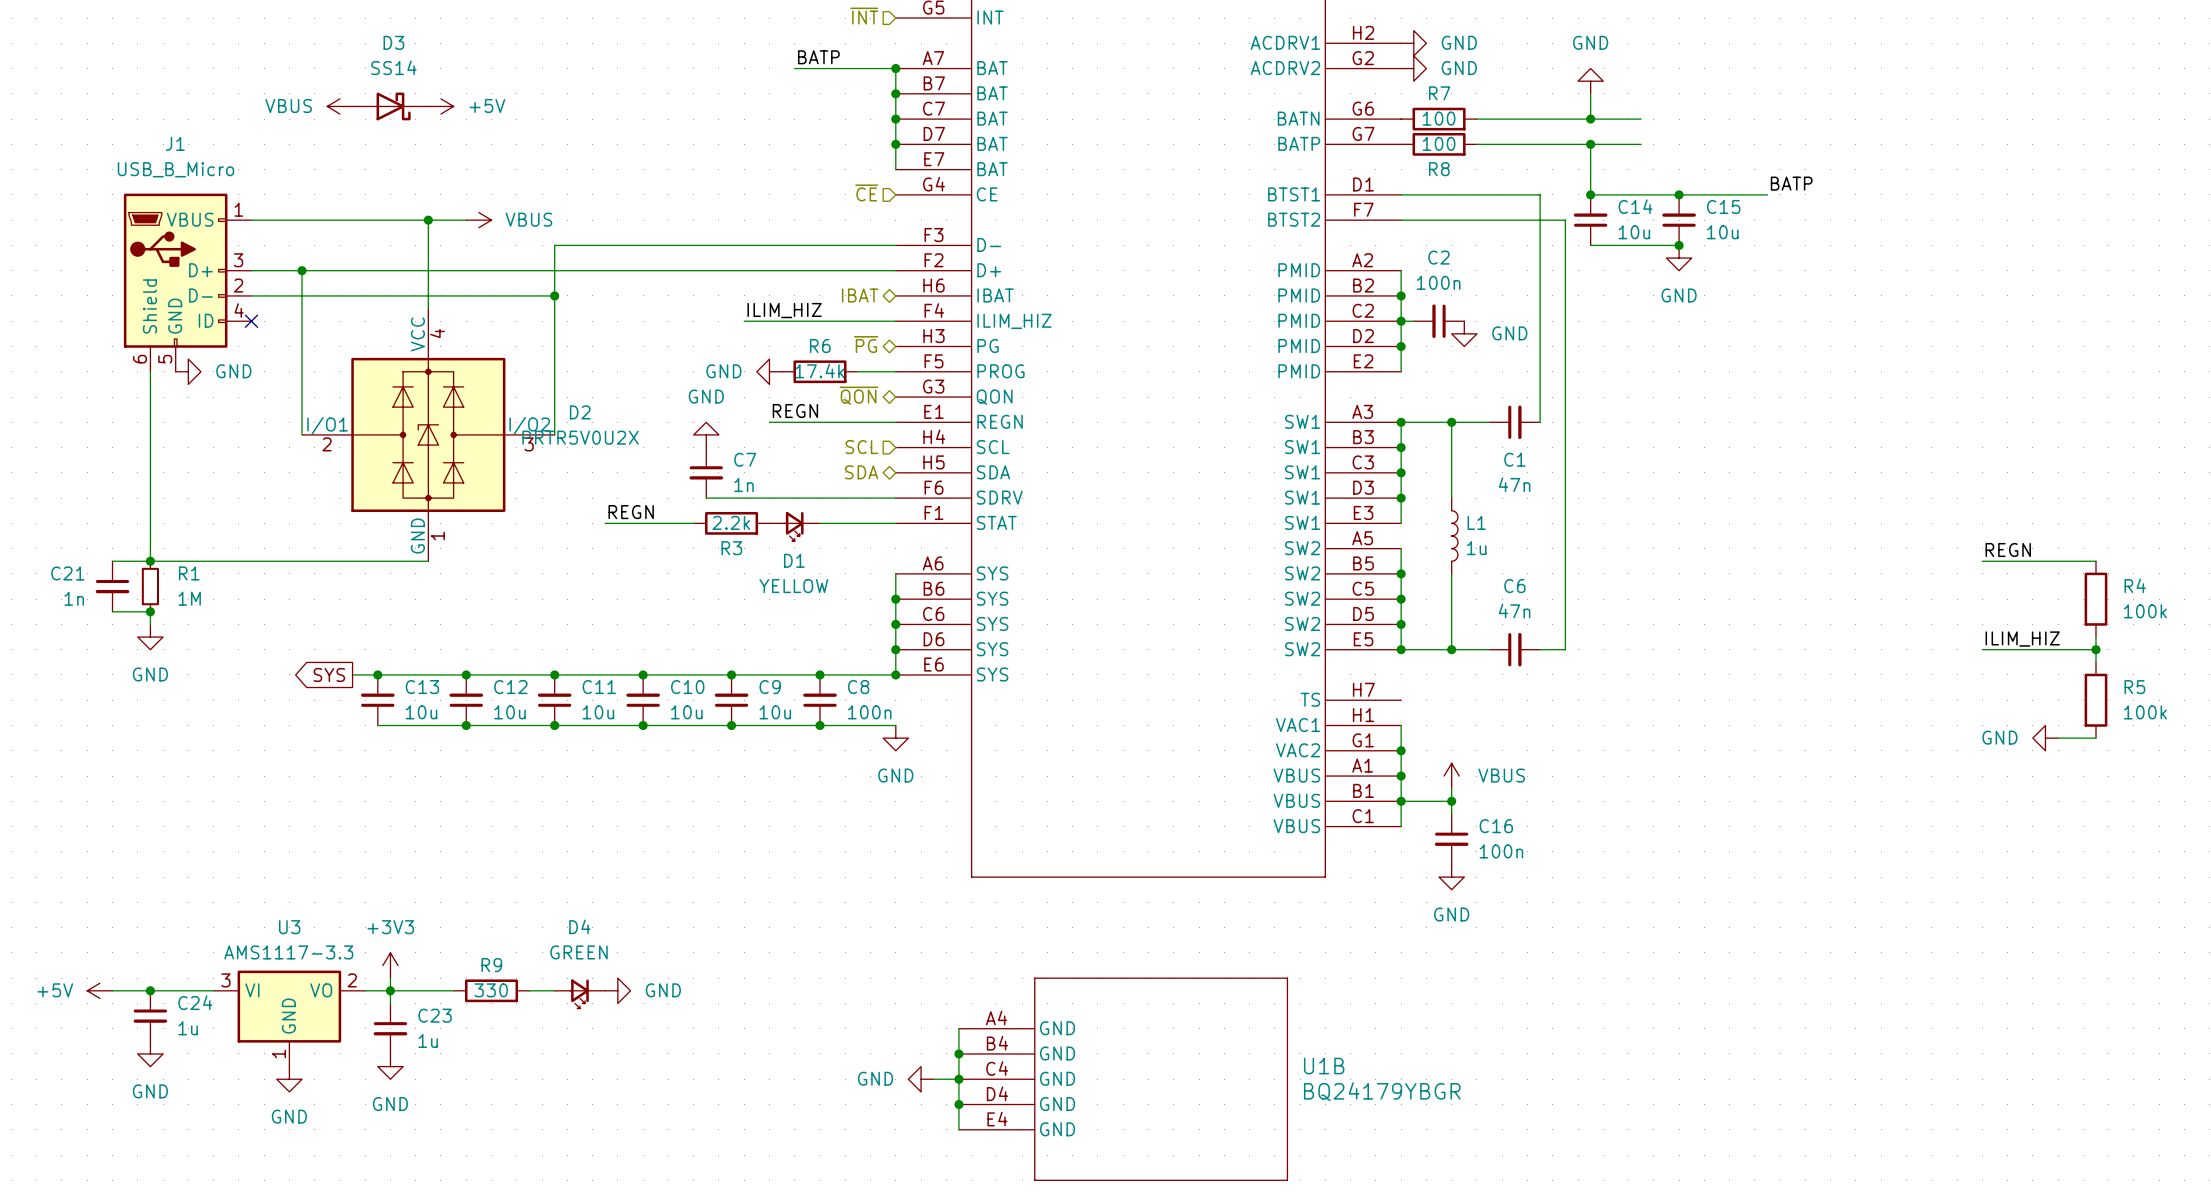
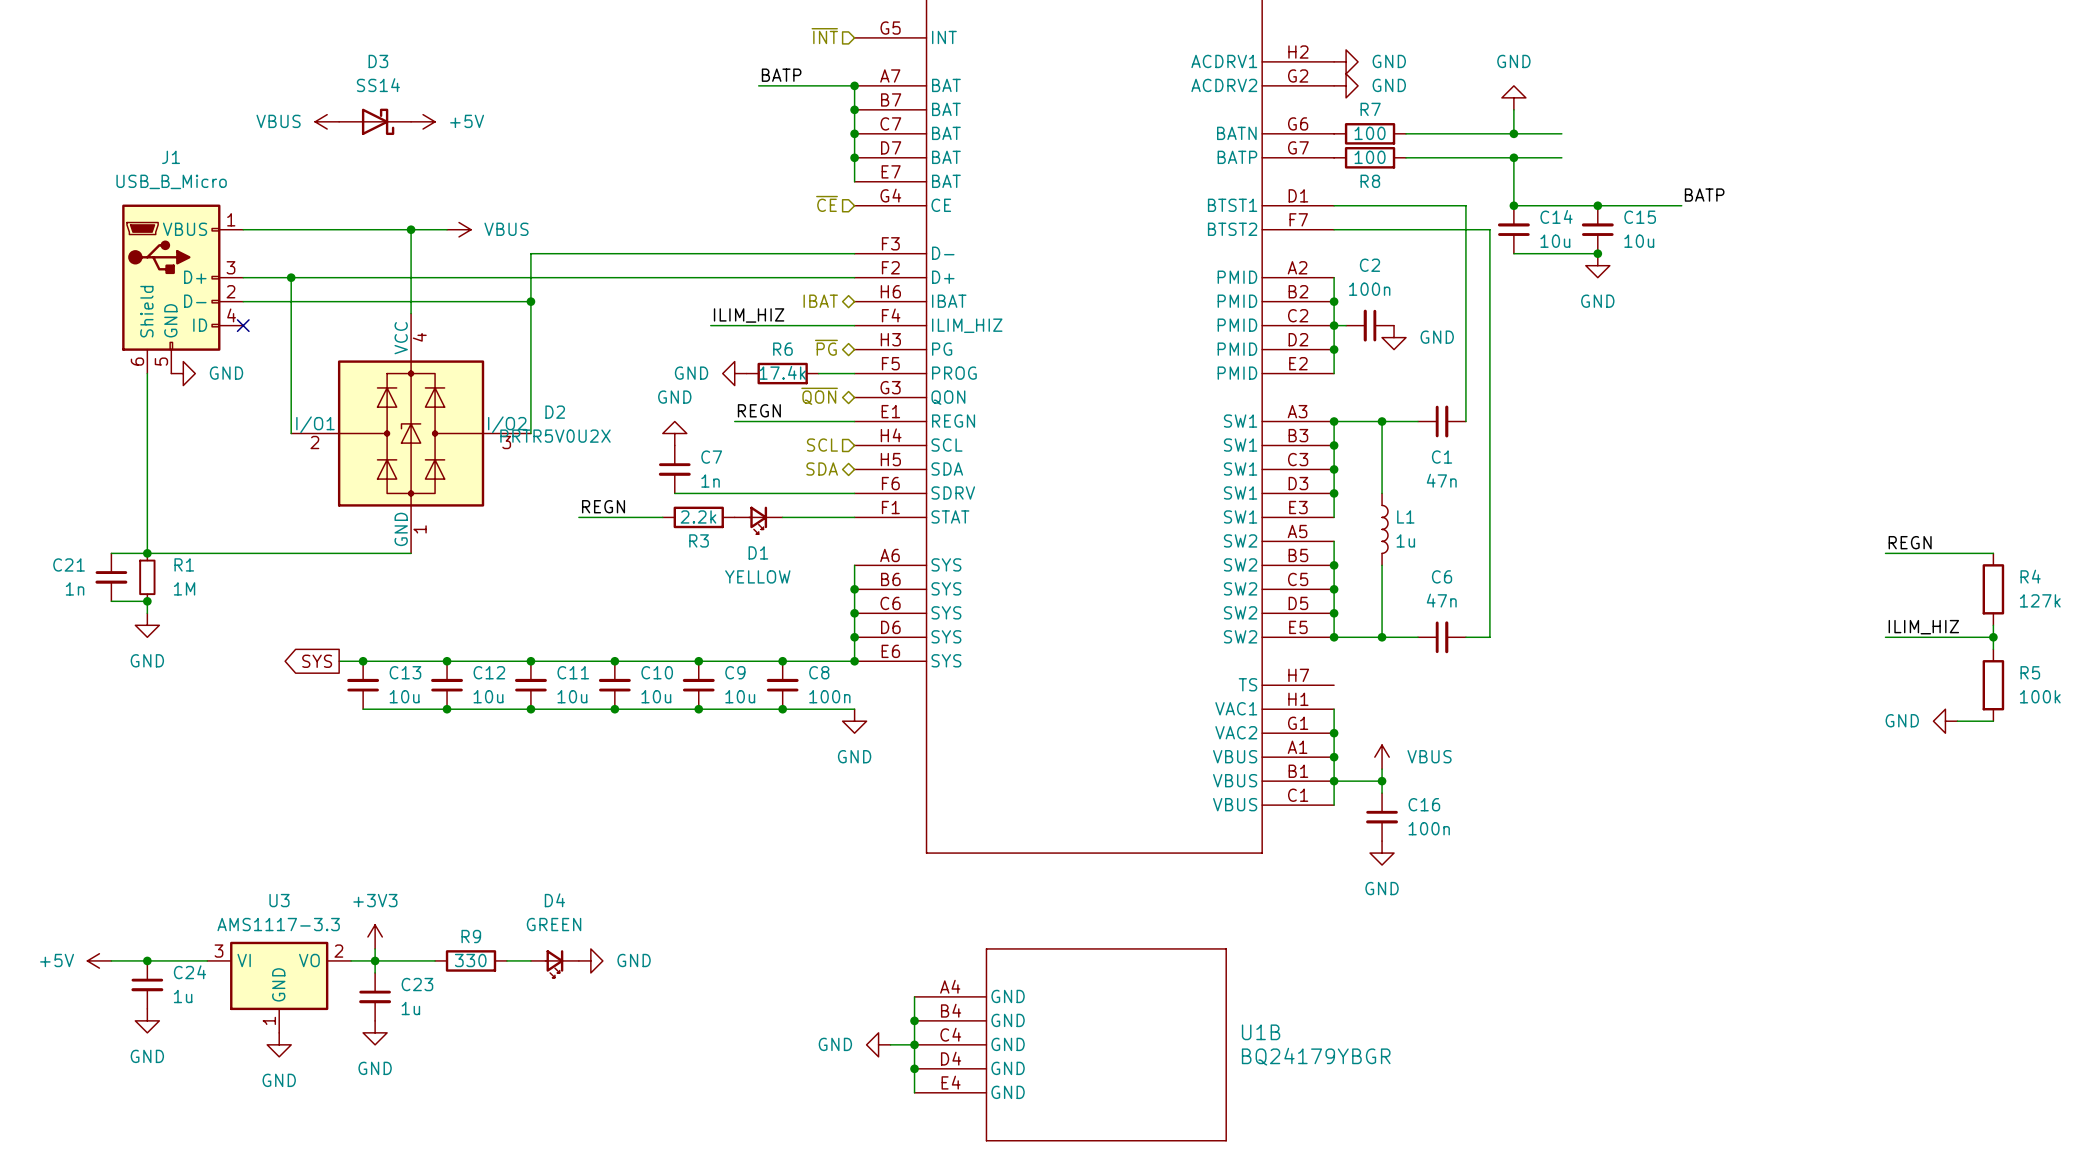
R4 value: 100k (2145, 611) -> 127k (2040, 600)

